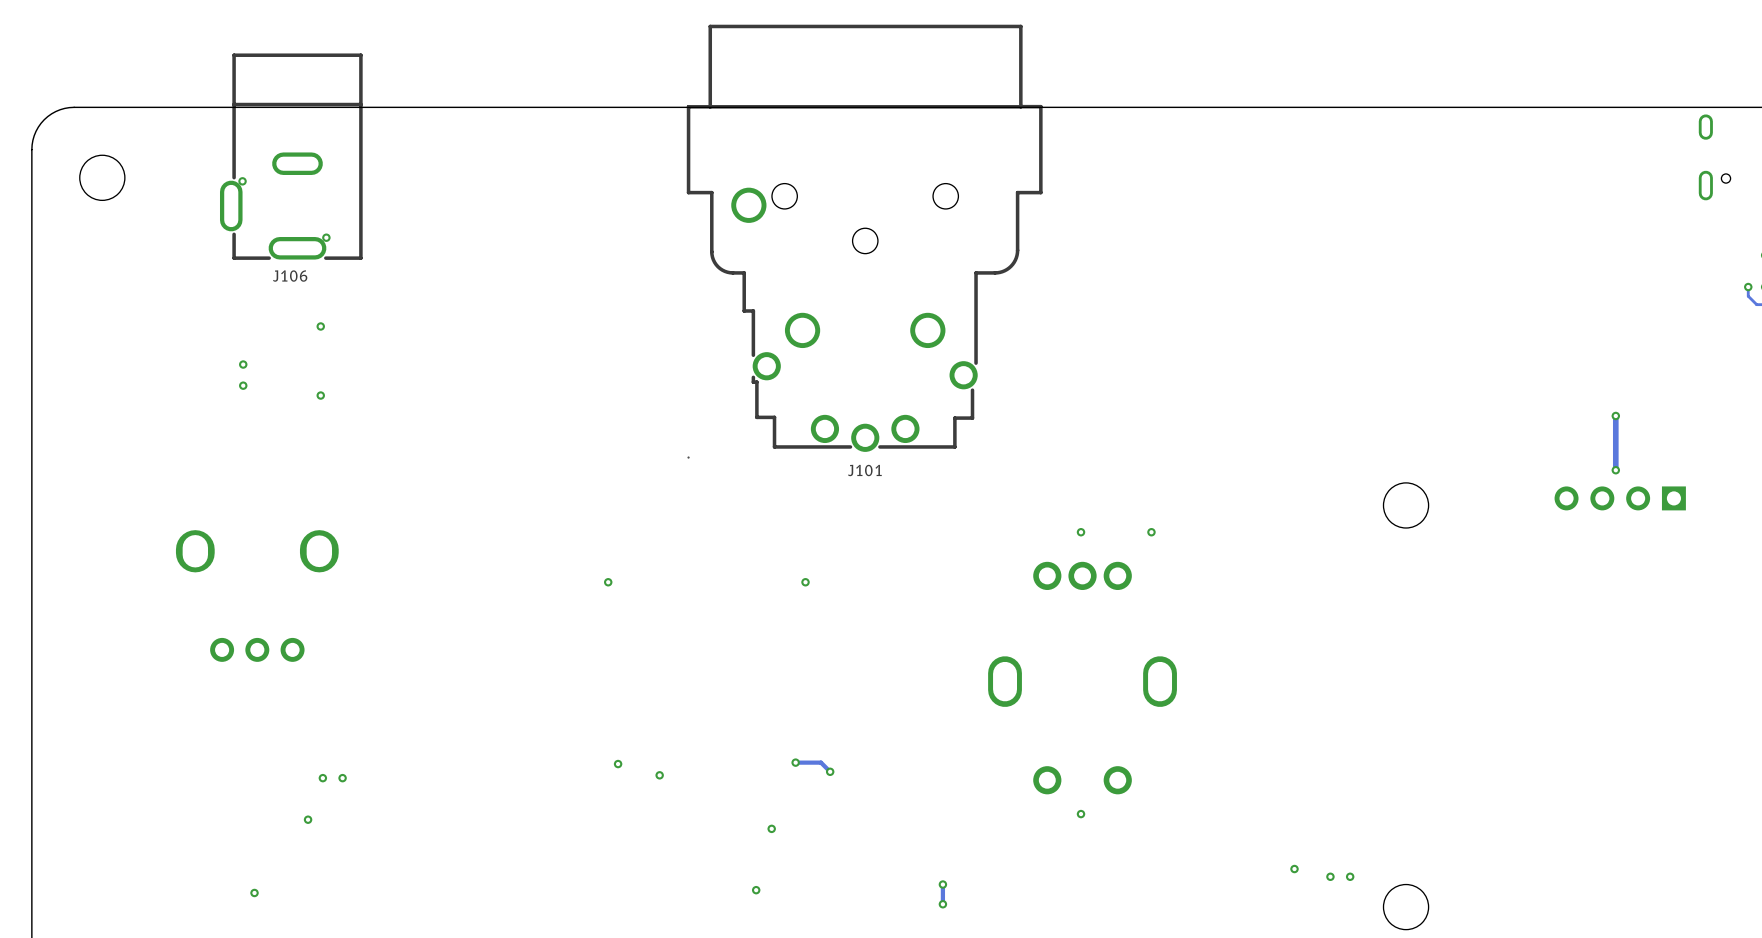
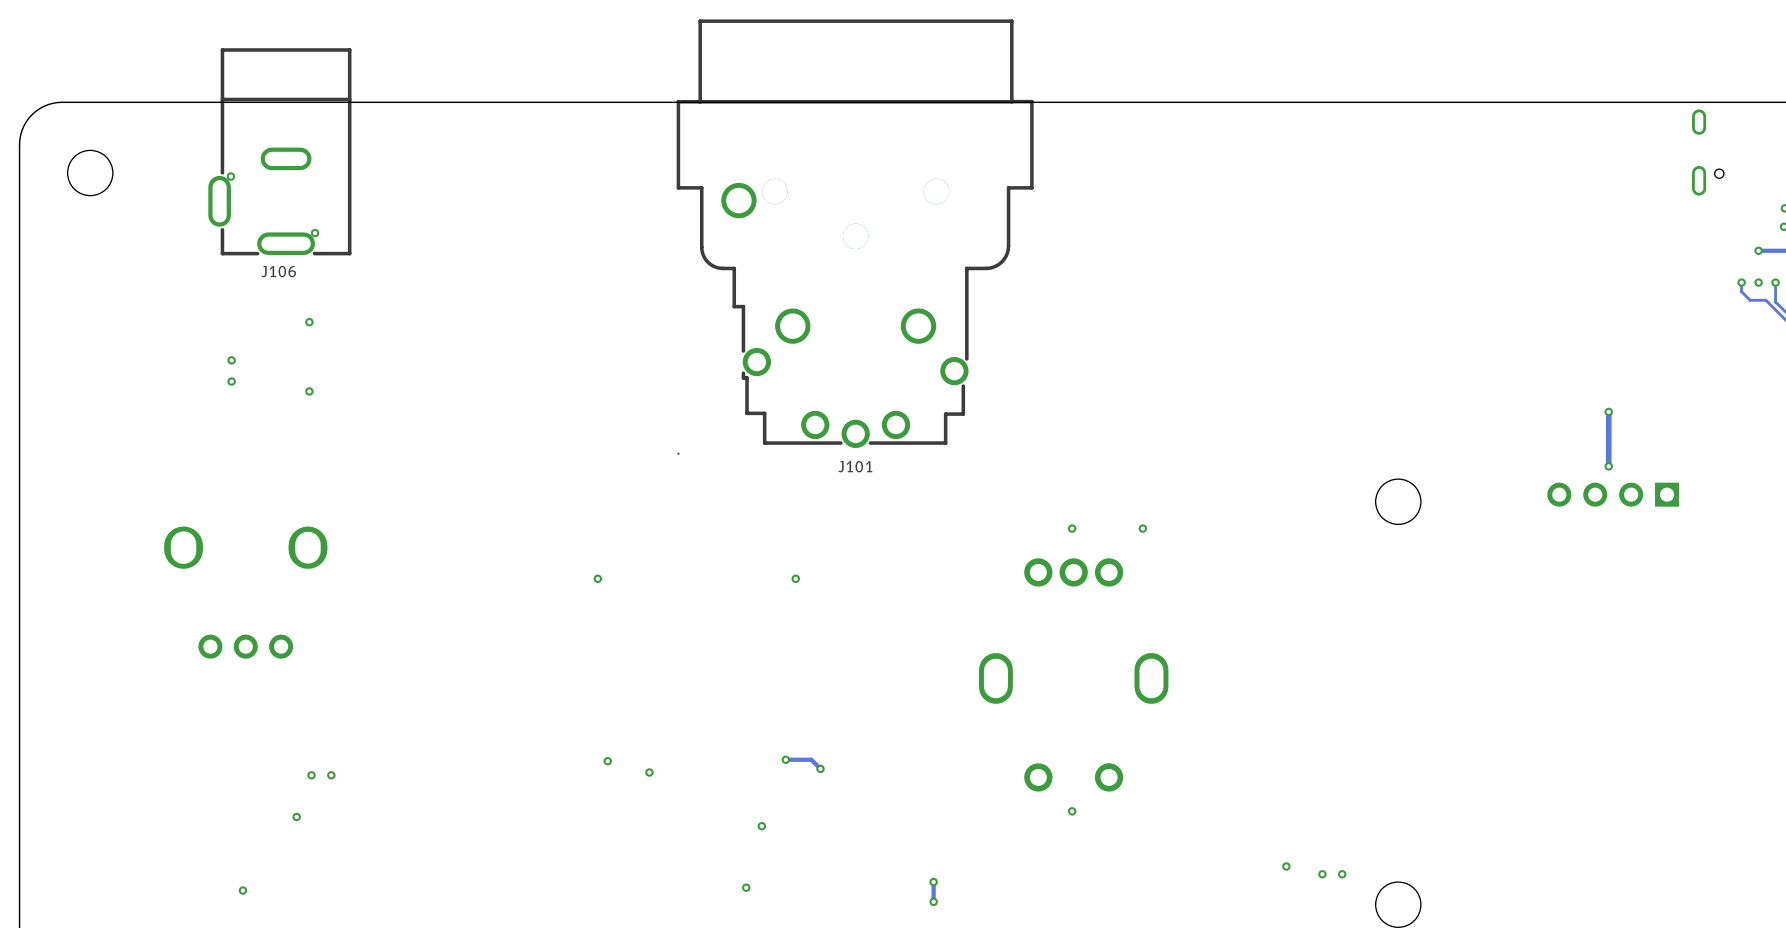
J101 footprint: [686, 24, 1043, 459] -> [676, 19, 1034, 455]

